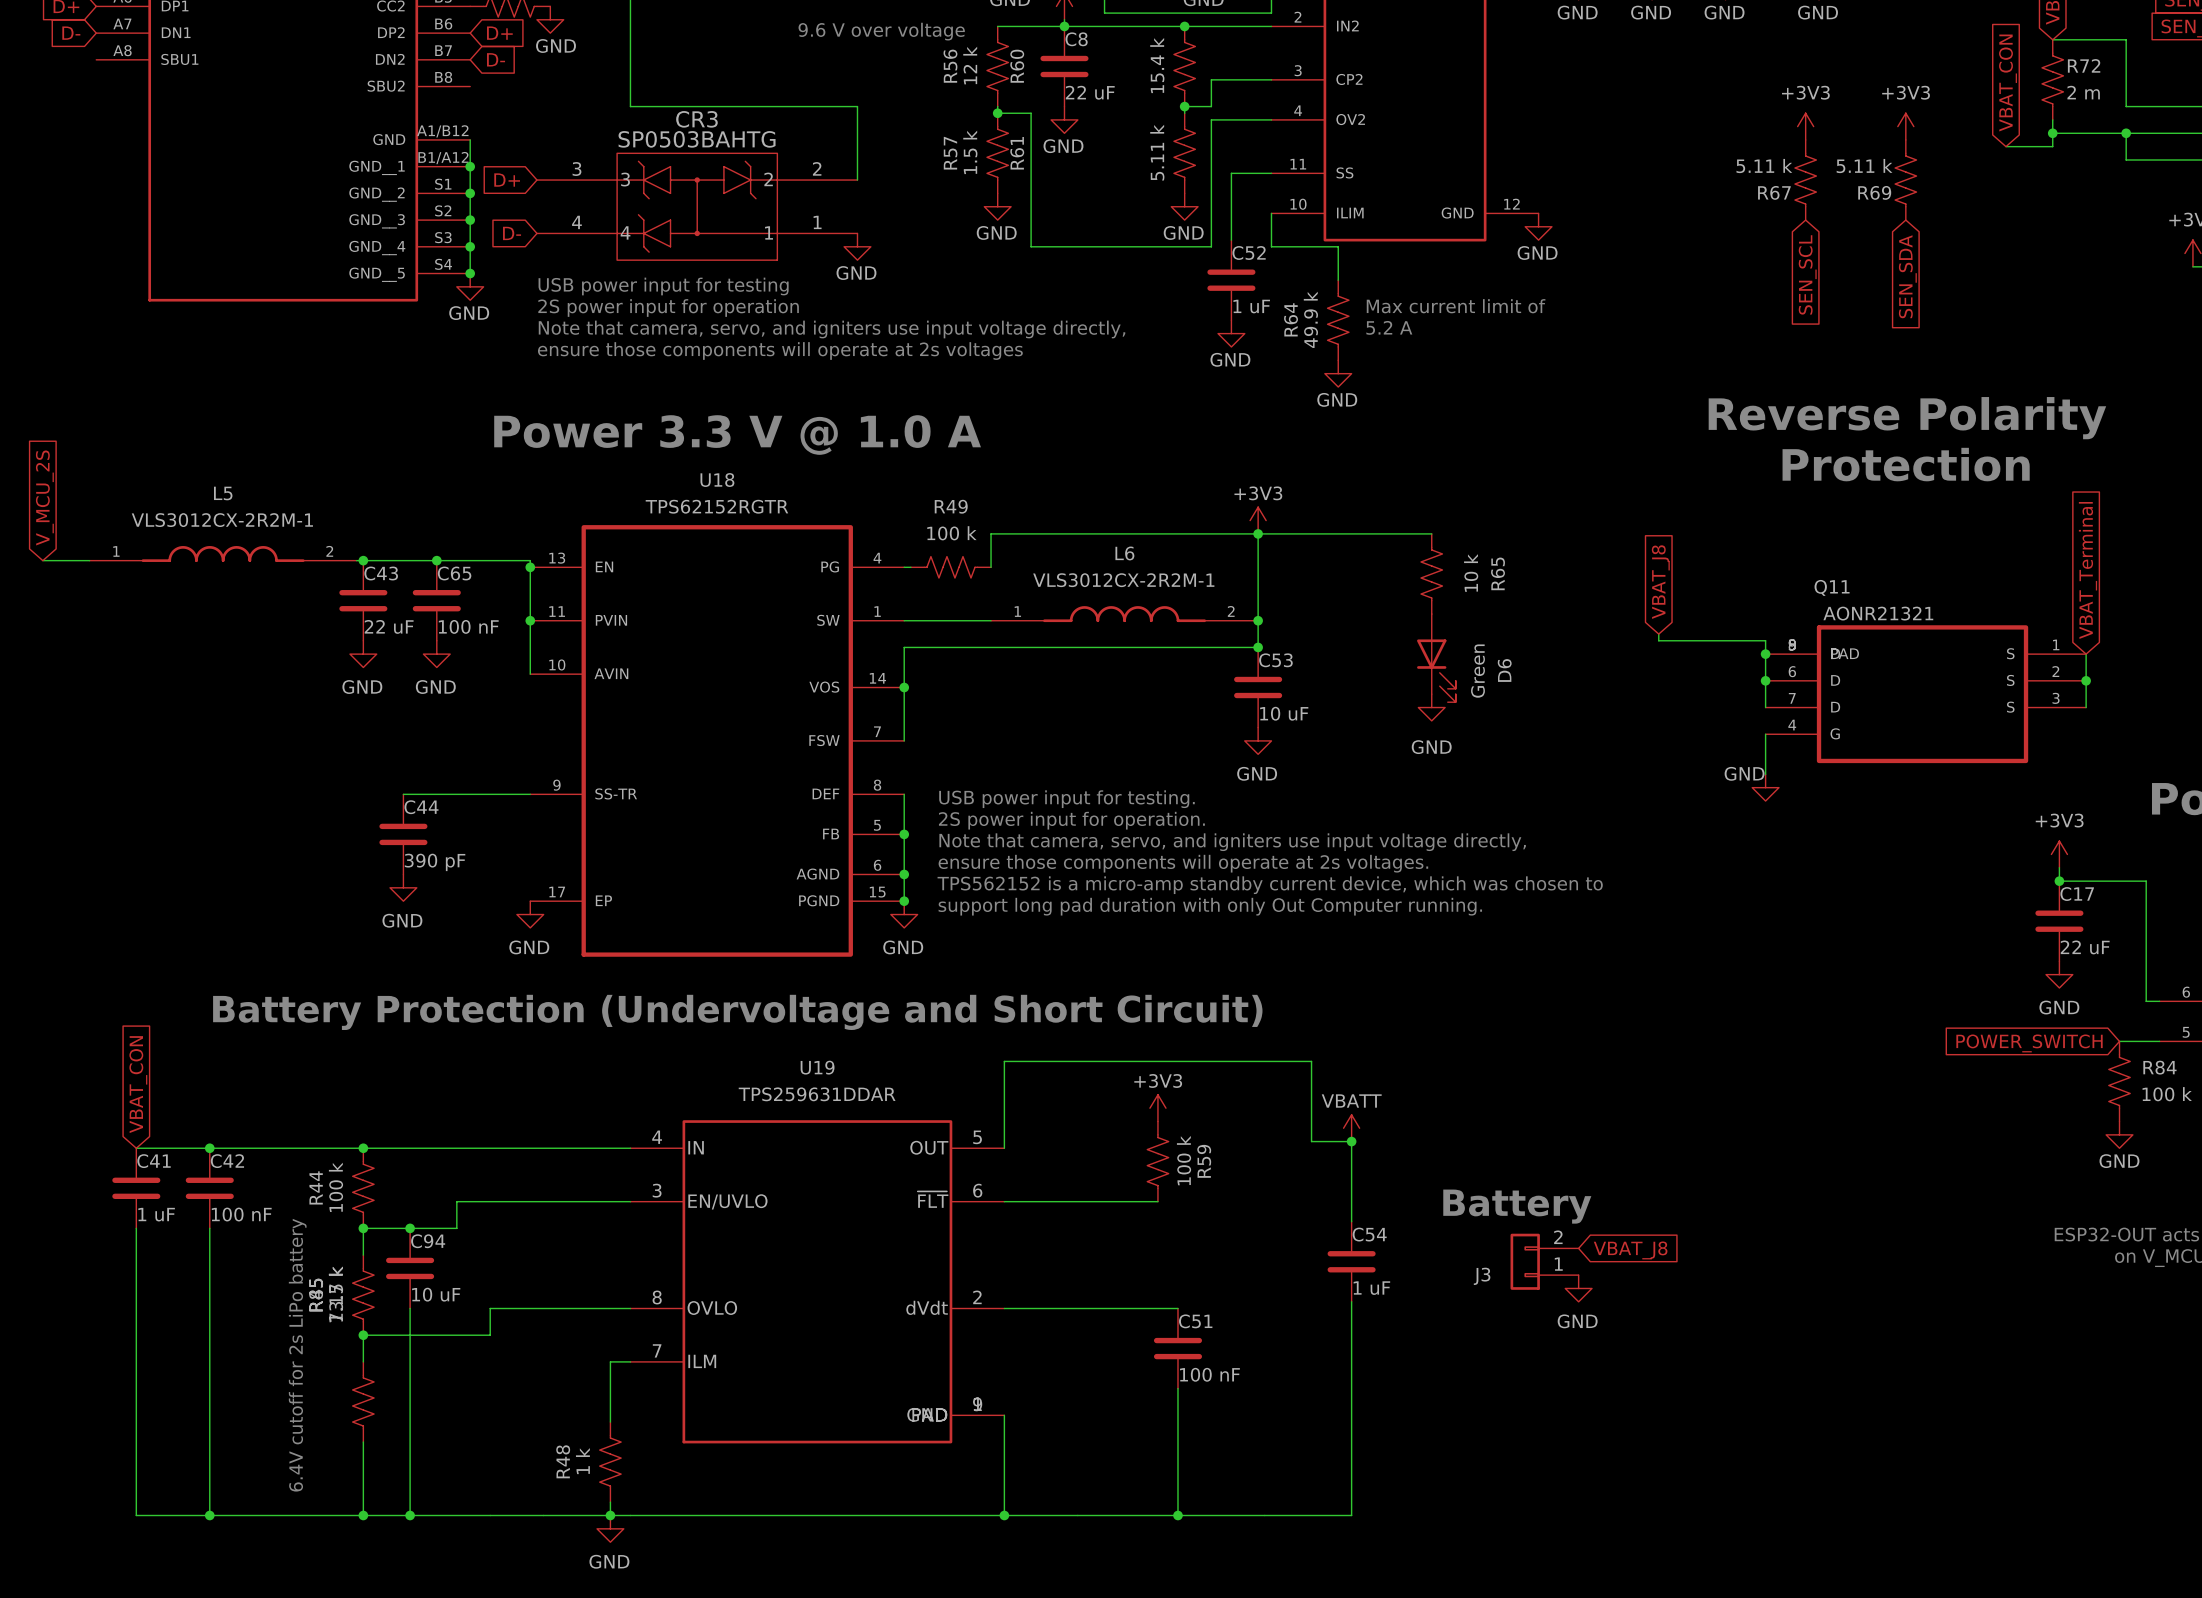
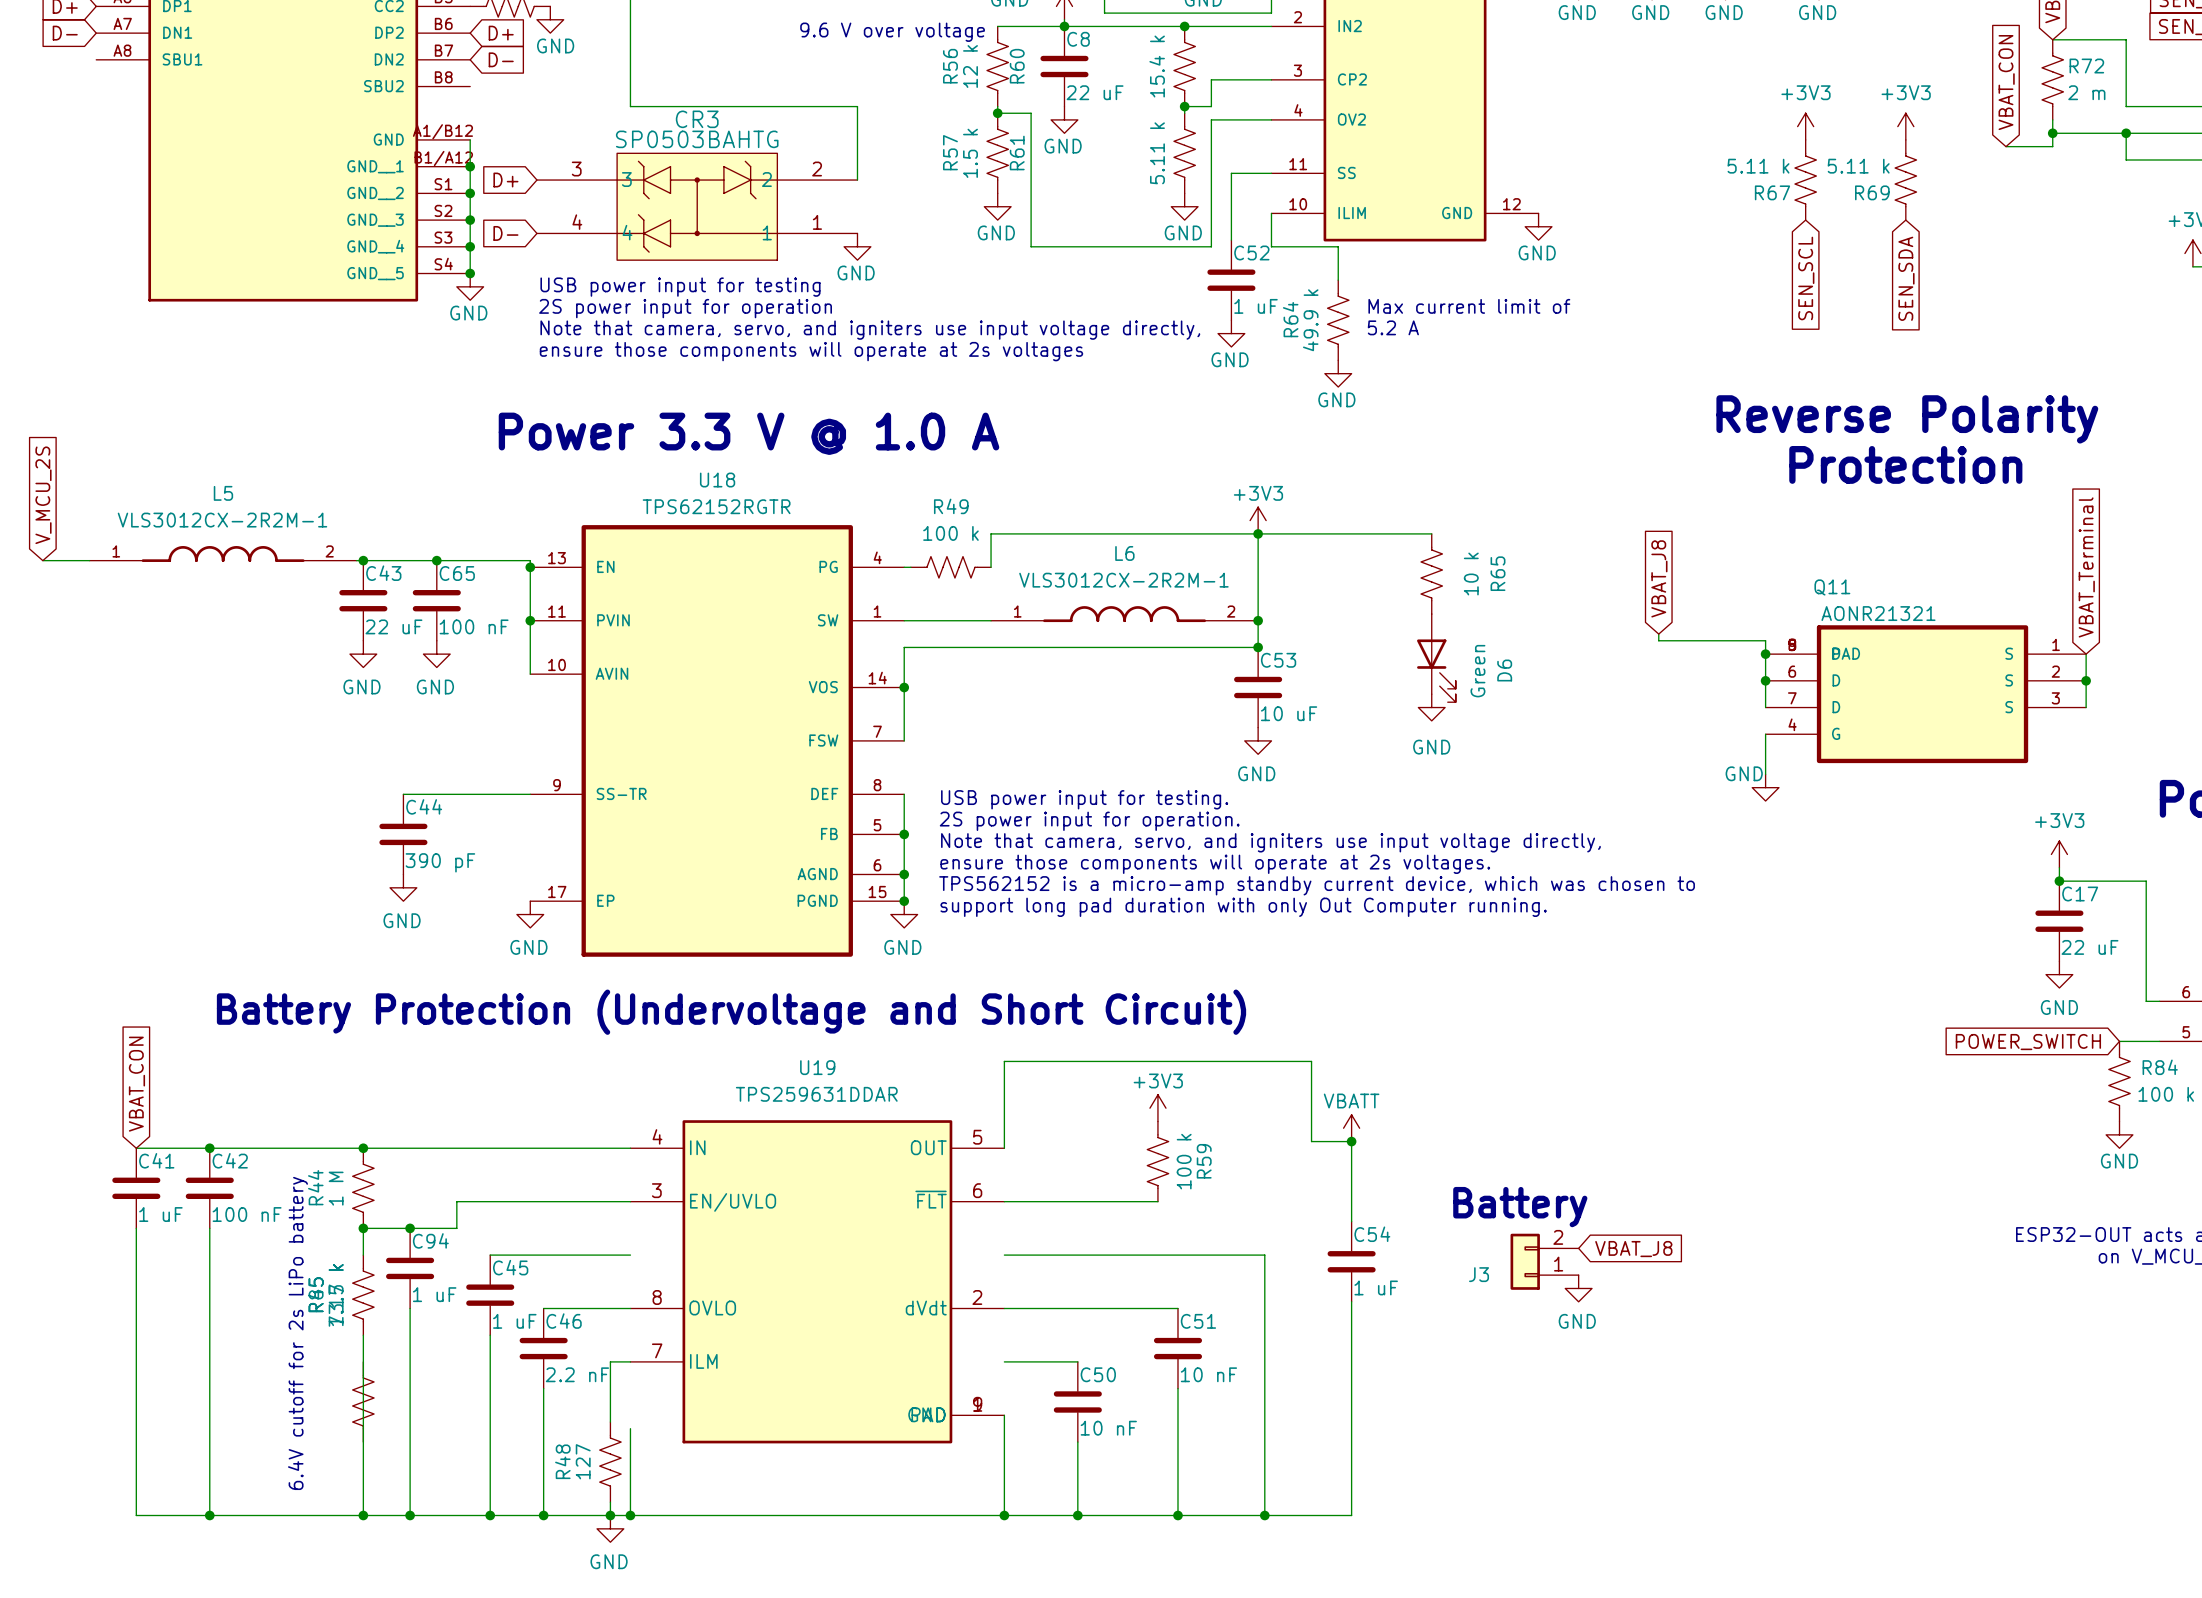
R44 value: 100 k (335, 1187) -> 1 M (336, 1188)
wire: none -> (490, 1255) (630, 1255)
wire: none -> (1004, 1255) (1264, 1255) (1264, 1515)
C94 value: 10 uF (436, 1294) -> 1 uF (434, 1294)
C45: none -> 1 uF (490, 1295)
wire: (543, 1308) (490, 1308) (490, 1335) (363, 1335) -> none
junction: (363, 1335) -> none
wire: none -> (490, 1335) (490, 1515)
C46: none -> 2.2 nF (543, 1348)
wire: none -> (363, 1361) (363, 1442)
wire: none -> (1004, 1361) (1077, 1361)
C51 value: 100 nF (1209, 1374) -> 10 nF (1208, 1374)
wire: none -> (543, 1388) (543, 1515)
C50: none -> 10 nF (1077, 1401)
wire: none -> (630, 1428) (630, 1515)
wire: none -> (1077, 1442) (1077, 1515)
R48 value: 1 k (582, 1461) -> 127 (583, 1461)
junction: none -> (490, 1515)
junction: none -> (543, 1515)
junction: none -> (630, 1515)
junction: none -> (1077, 1515)
junction: none -> (1264, 1515)

